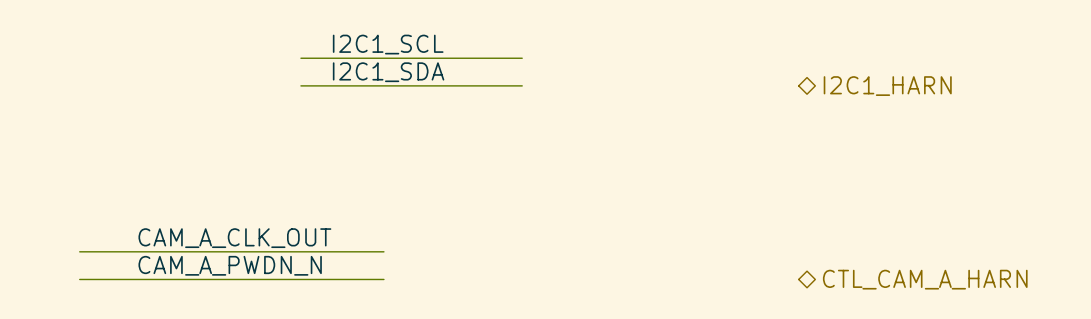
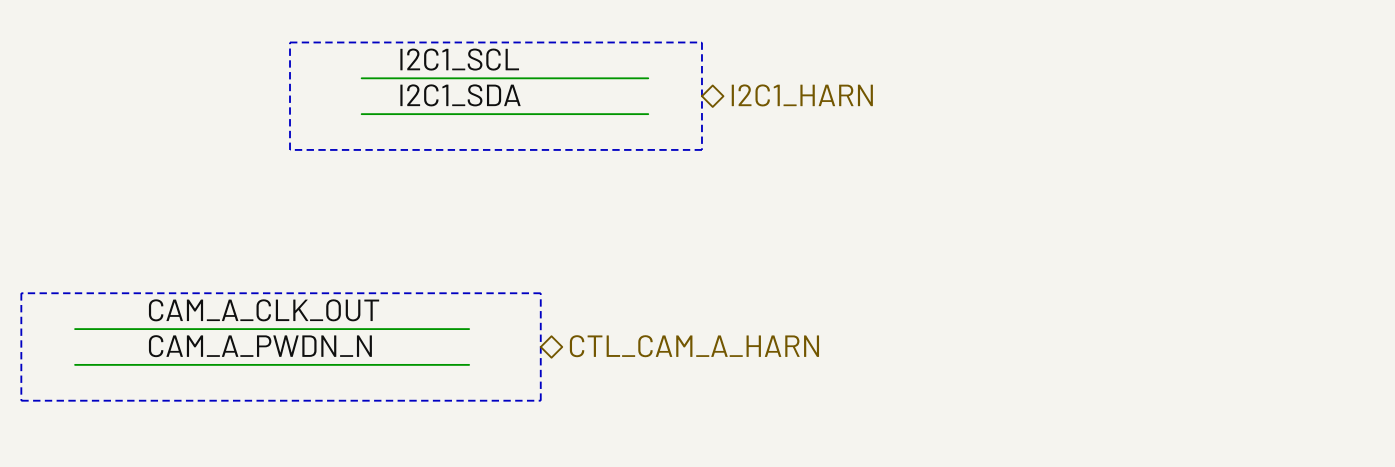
line: none -> (290, 42) (290, 149) (701, 149) (701, 42) (290, 42)
hierarchical label position: I2C1_HARN (887, 86) -> I2C1_HARN (802, 95)
line: none -> (21, 293) (540, 293) (540, 400) (21, 400) (21, 293)
hierarchical label: none -> CTL_CAM_A_HARN (694, 346)
hierarchical label: CTL_CAM_A_HARN (925, 279) -> none

